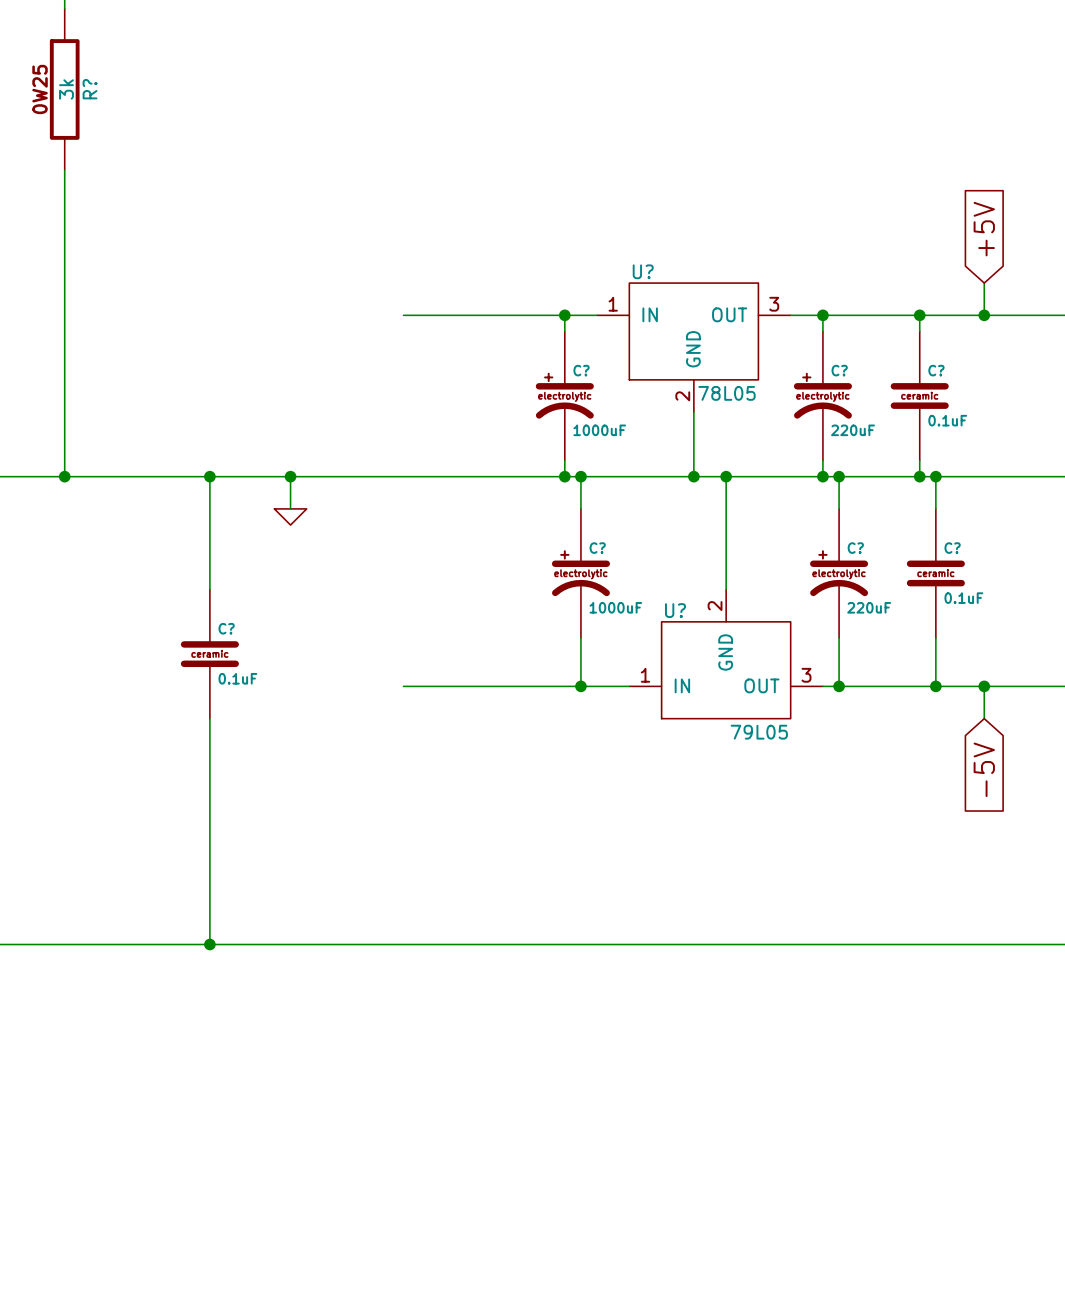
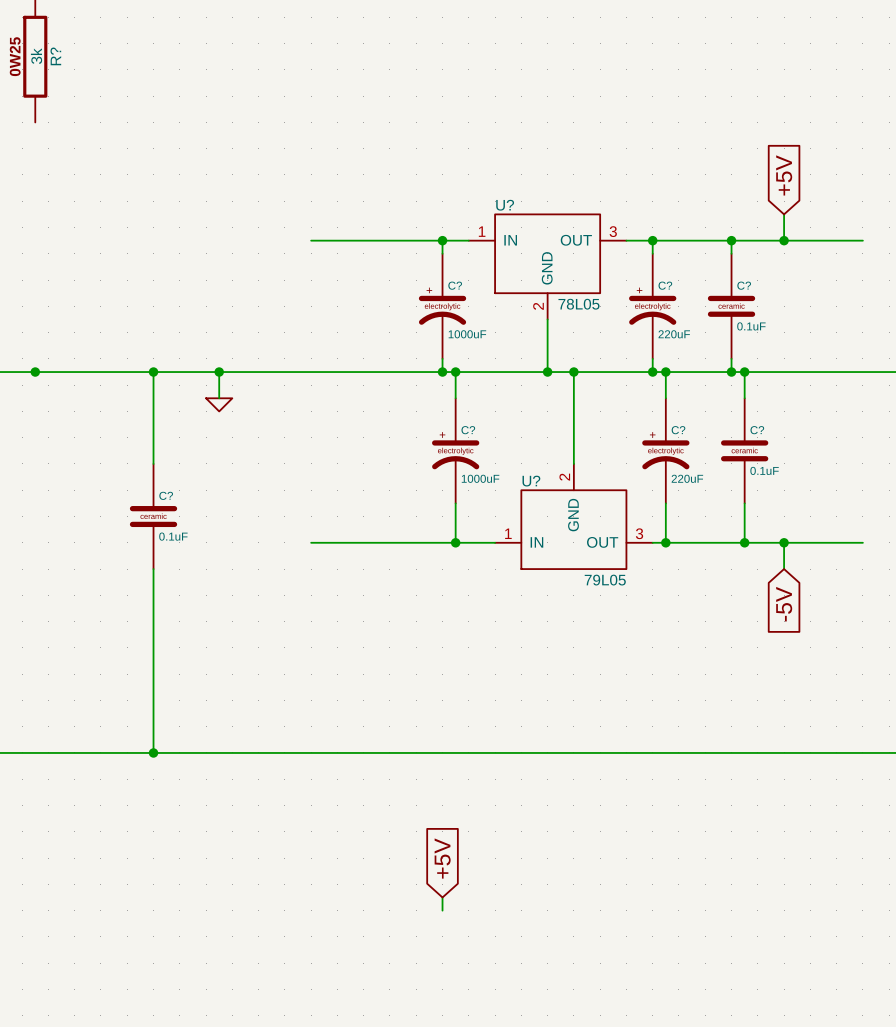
wire: (64, 170) (64, 476) -> none
global label: none -> +5V (442, 858)
wire: none -> (442, 897) (442, 910)

